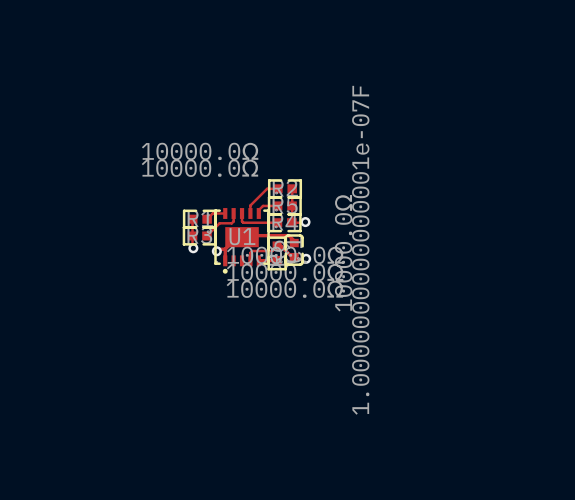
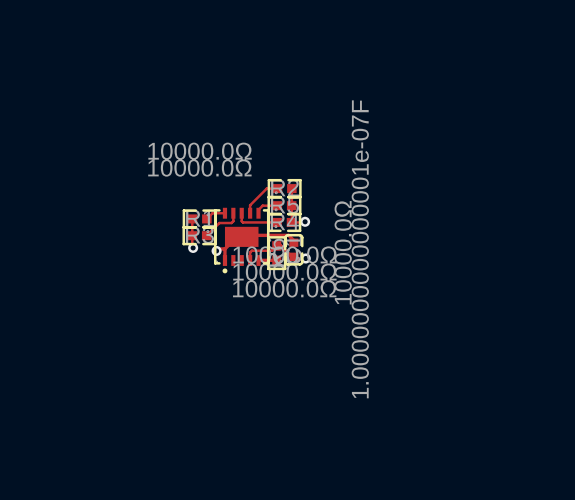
U1 name: U1 (242, 236) -> none

